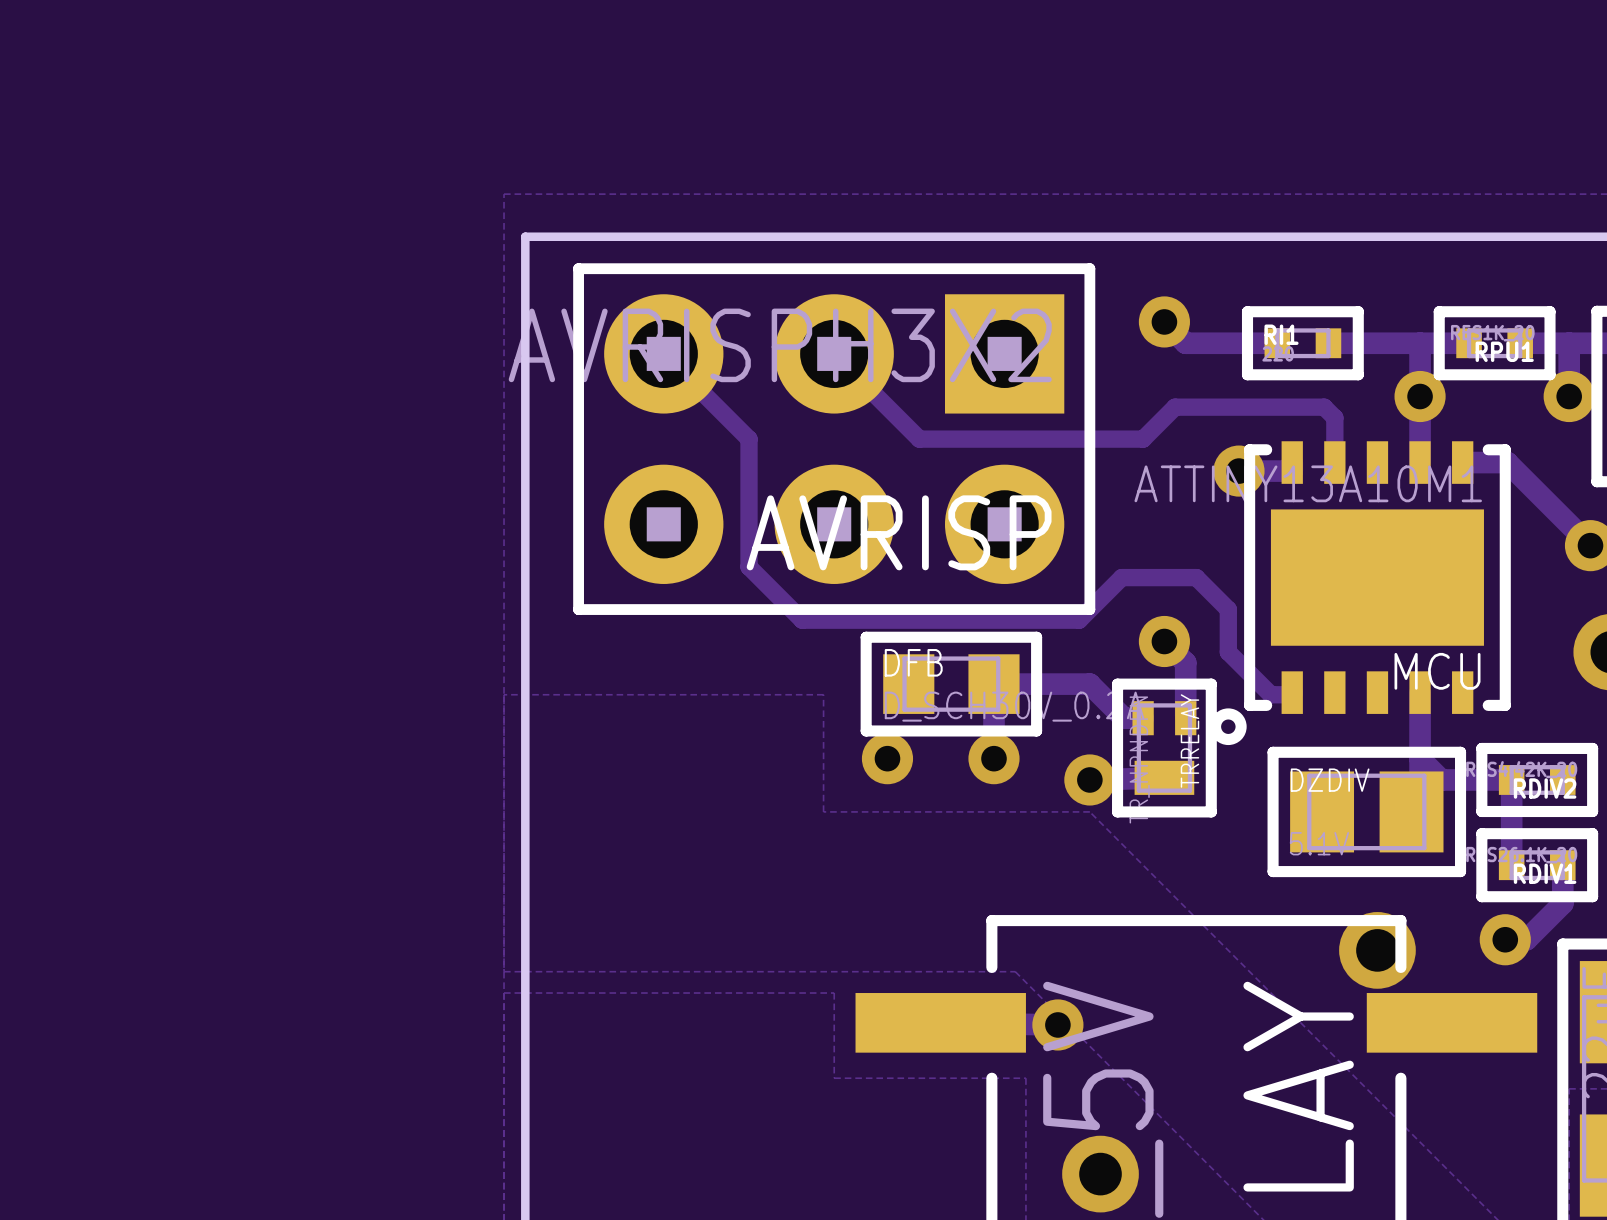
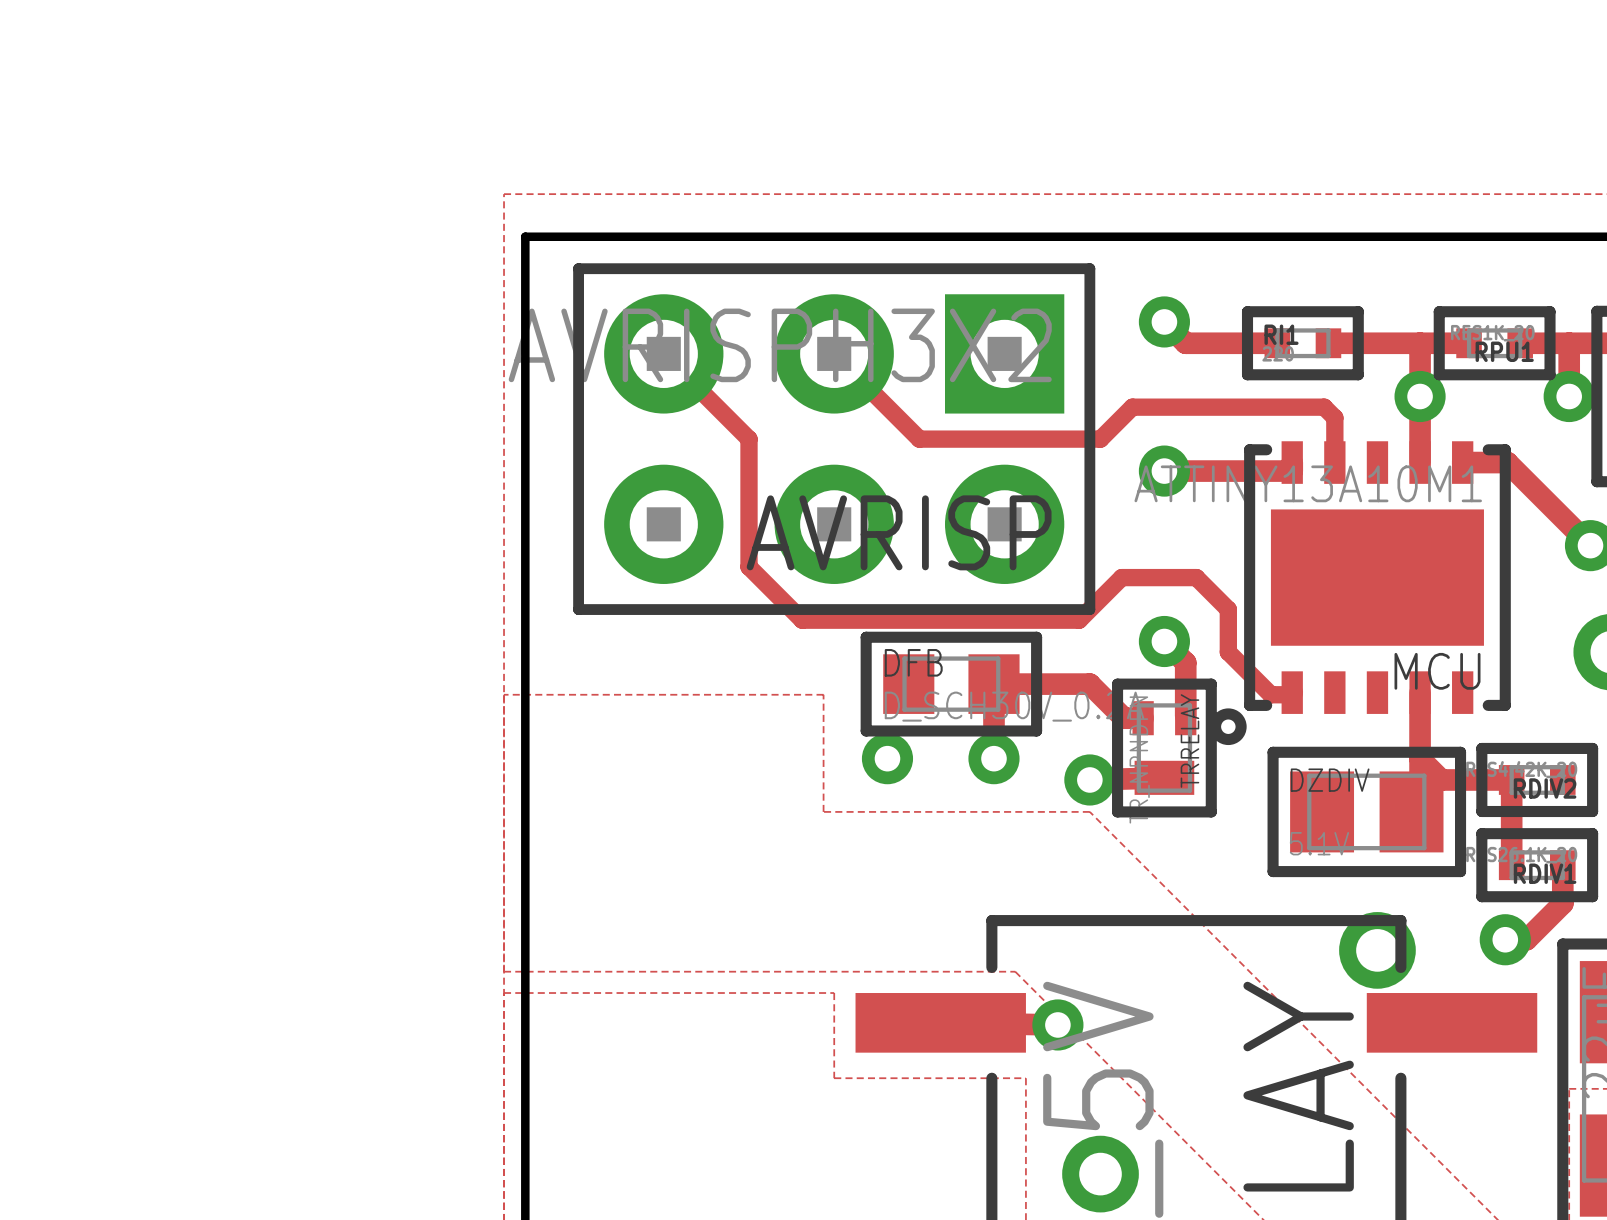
track: (1175, 407) (1143, 439) (1100, 439) -> (1175, 407) (1132, 407) (1100, 439)
track: none -> (1164, 471) (1238, 471)
via position: (1238, 471) -> (1164, 471)

